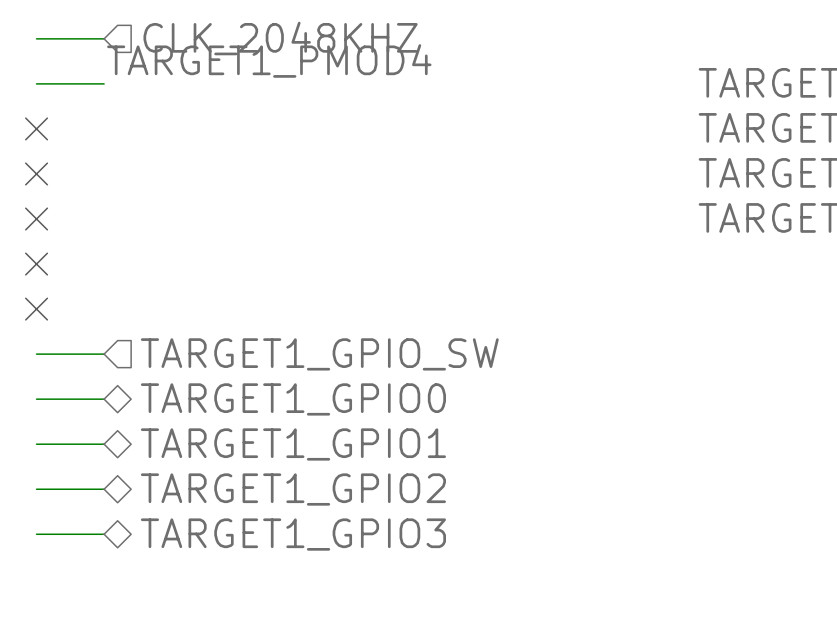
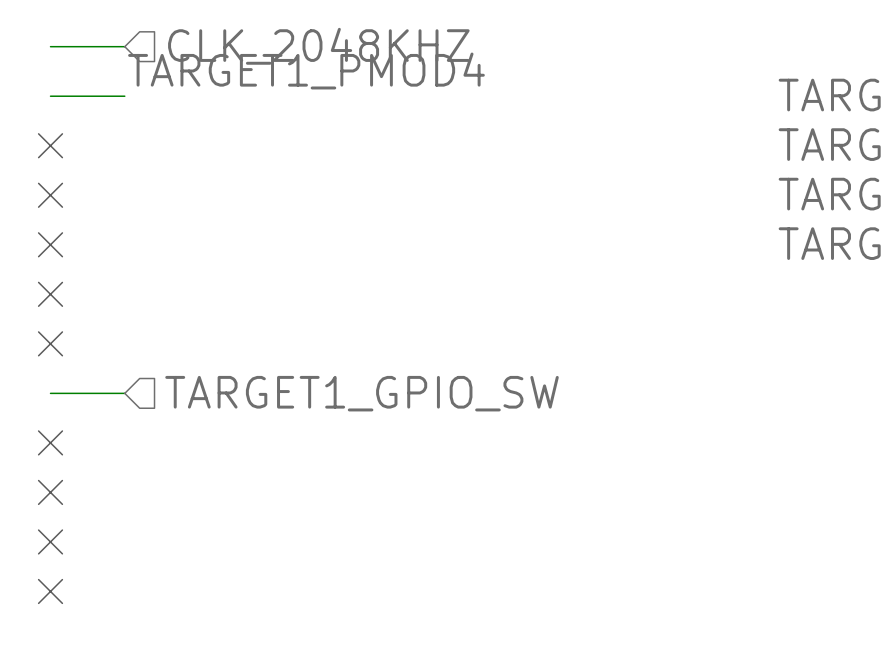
wire: (36, 399) (104, 399) -> none
no-connect mark: none -> (50, 442)
hierarchical label: TARGET1_GPIO0 (293, 399) -> none
wire: (36, 444) (104, 444) -> none
no-connect mark: none -> (50, 492)
hierarchical label: TARGET1_GPIO1 (293, 444) -> none
wire: (36, 489) (104, 489) -> none
no-connect mark: none -> (50, 541)
hierarchical label: TARGET1_GPIO2 (293, 489) -> none
wire: (36, 534) (104, 534) -> none
no-connect mark: none -> (50, 591)
hierarchical label: TARGET1_GPIO3 (293, 534) -> none

